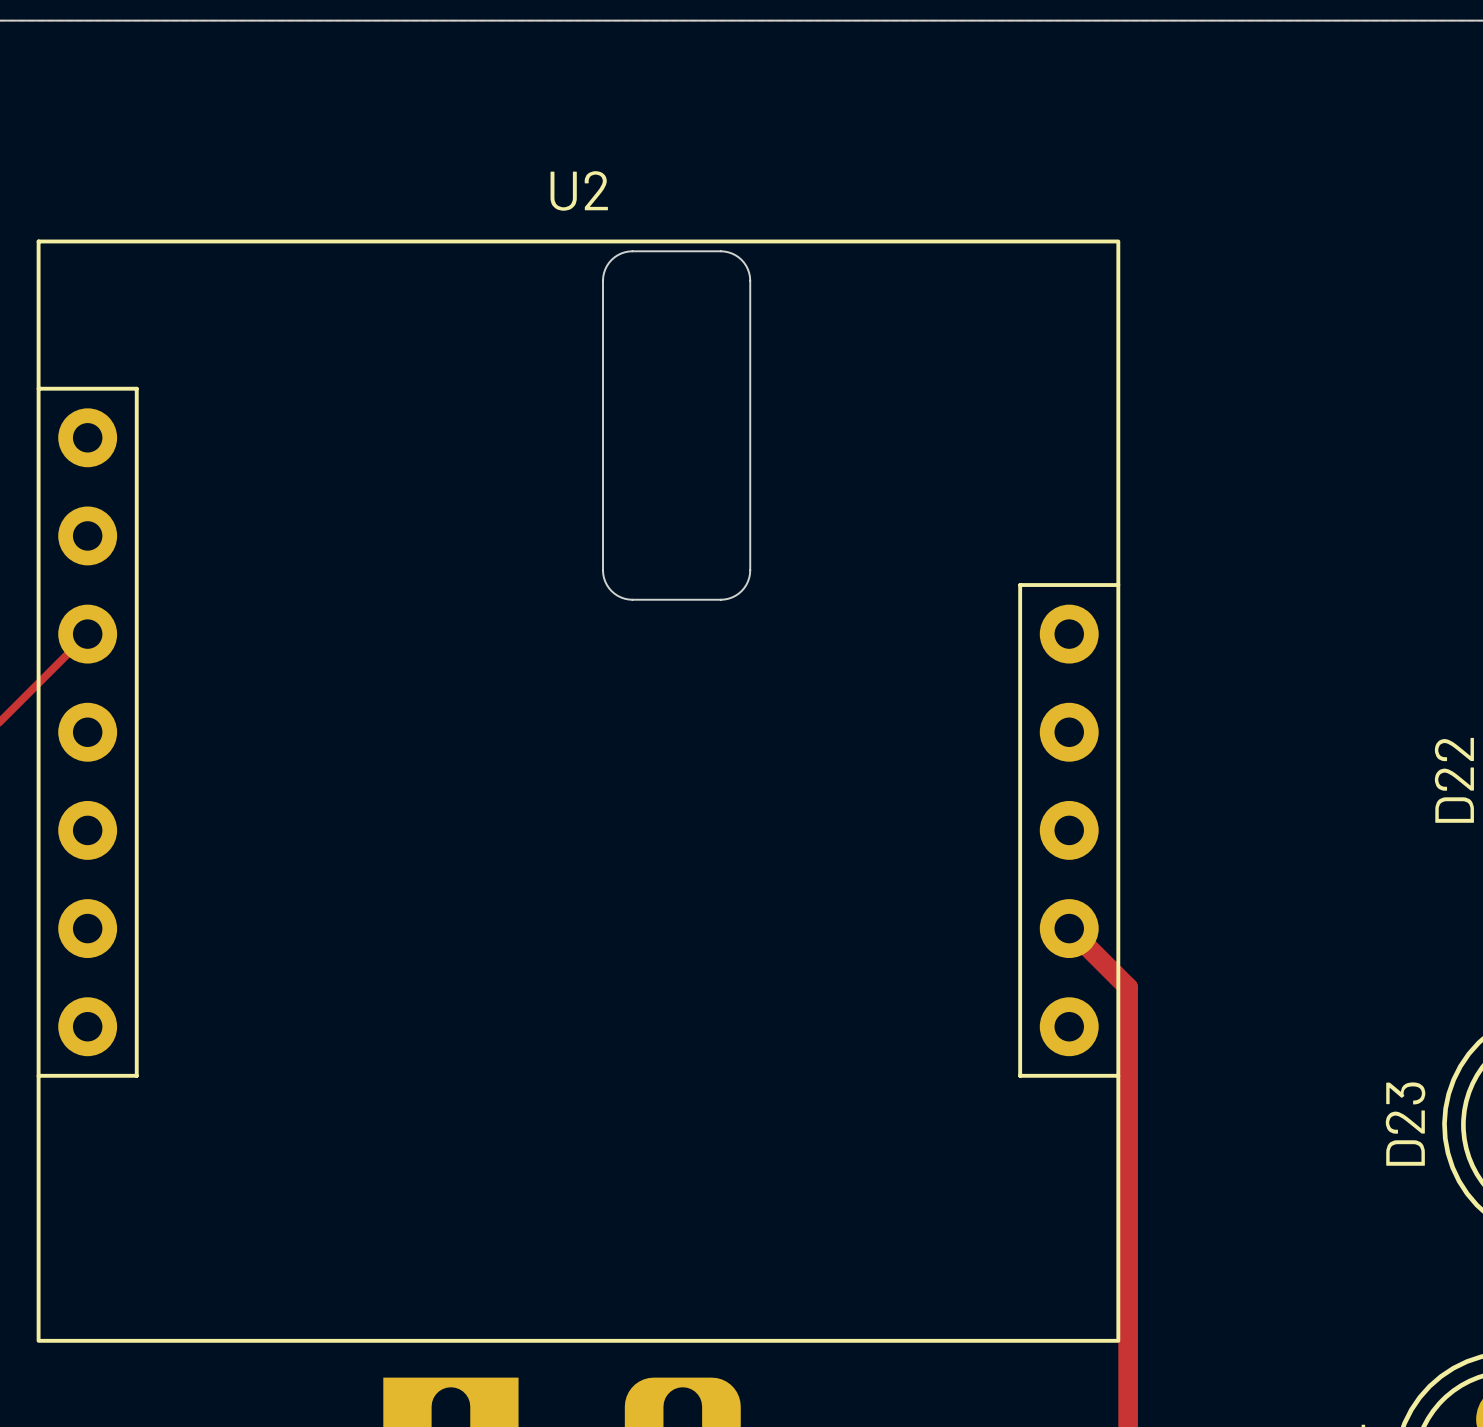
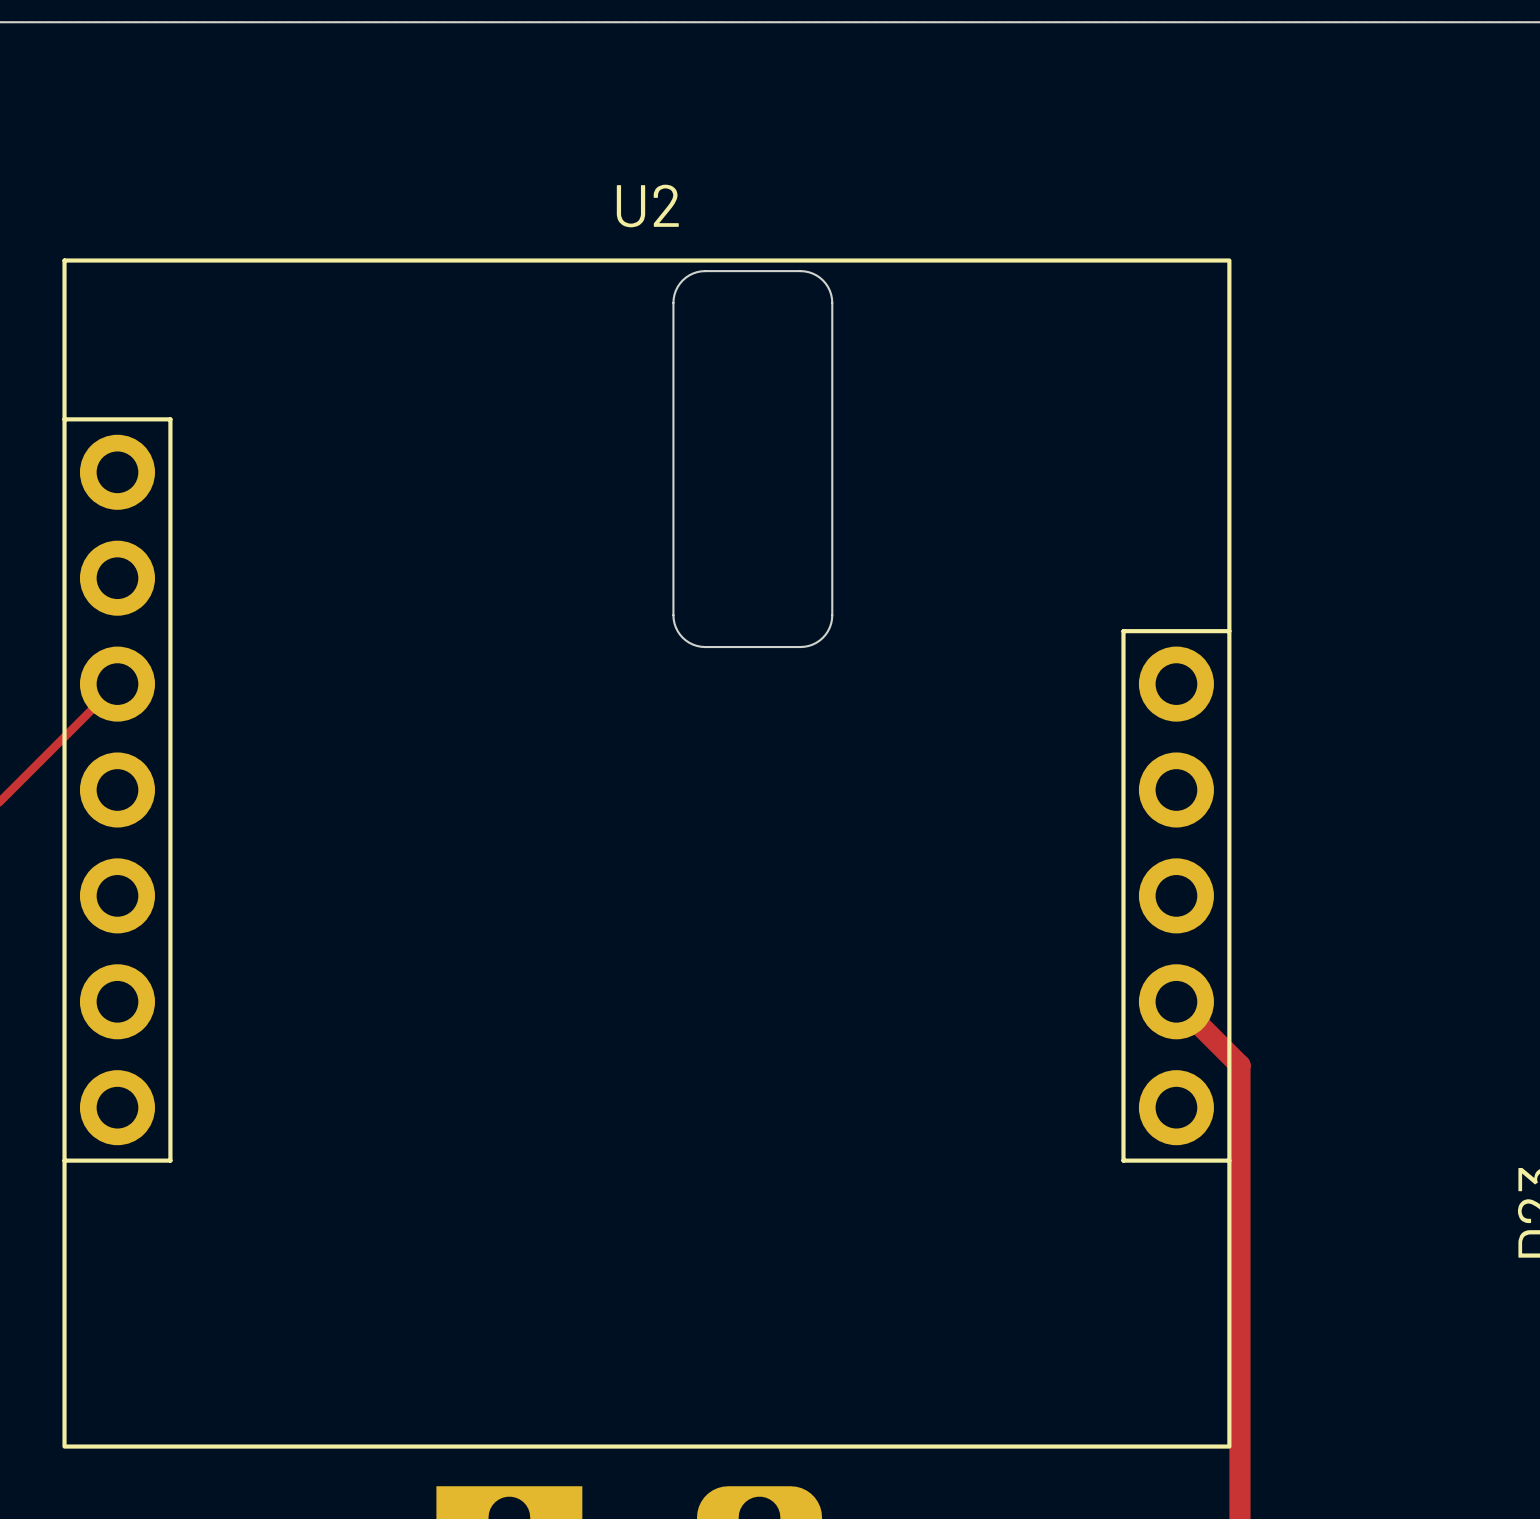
U2 footprint: [36, 239, 1121, 1343] -> [62, 258, 1232, 1449]

